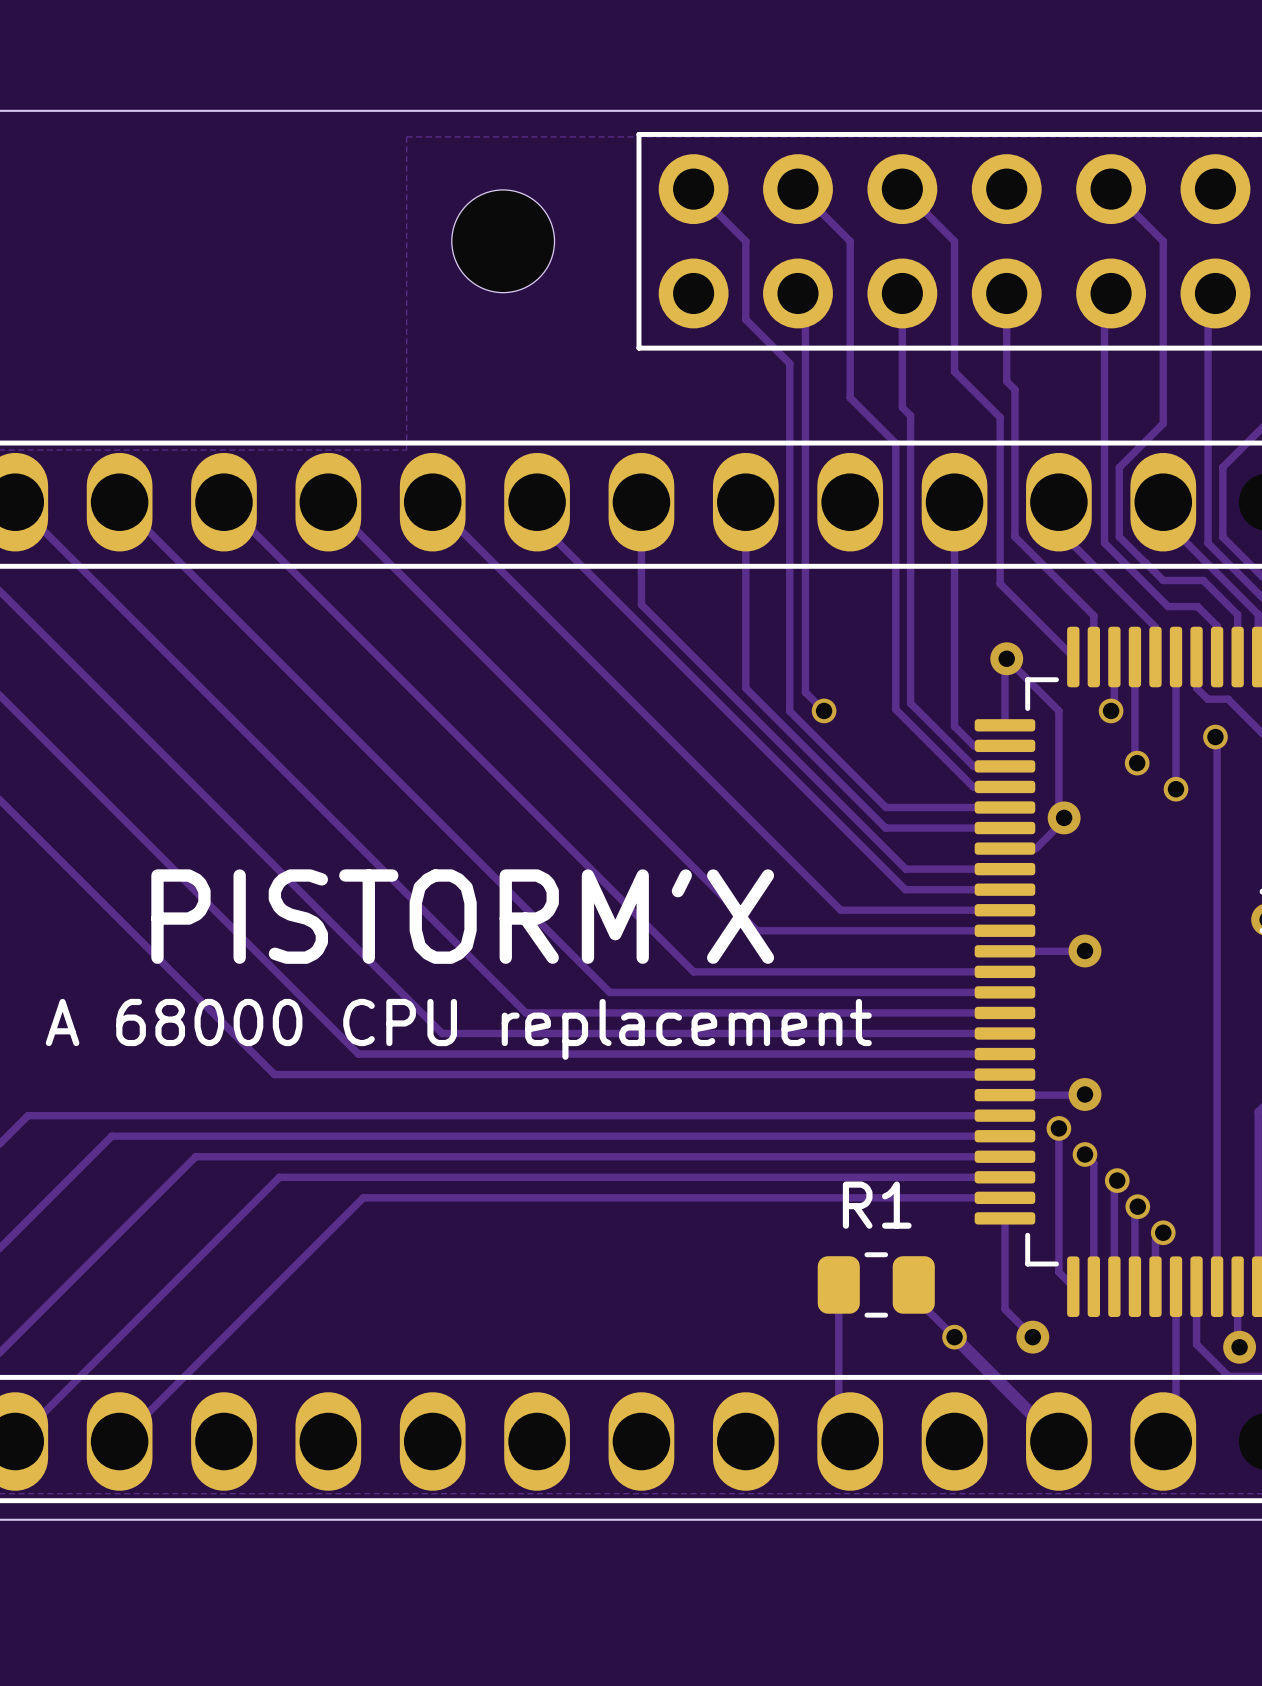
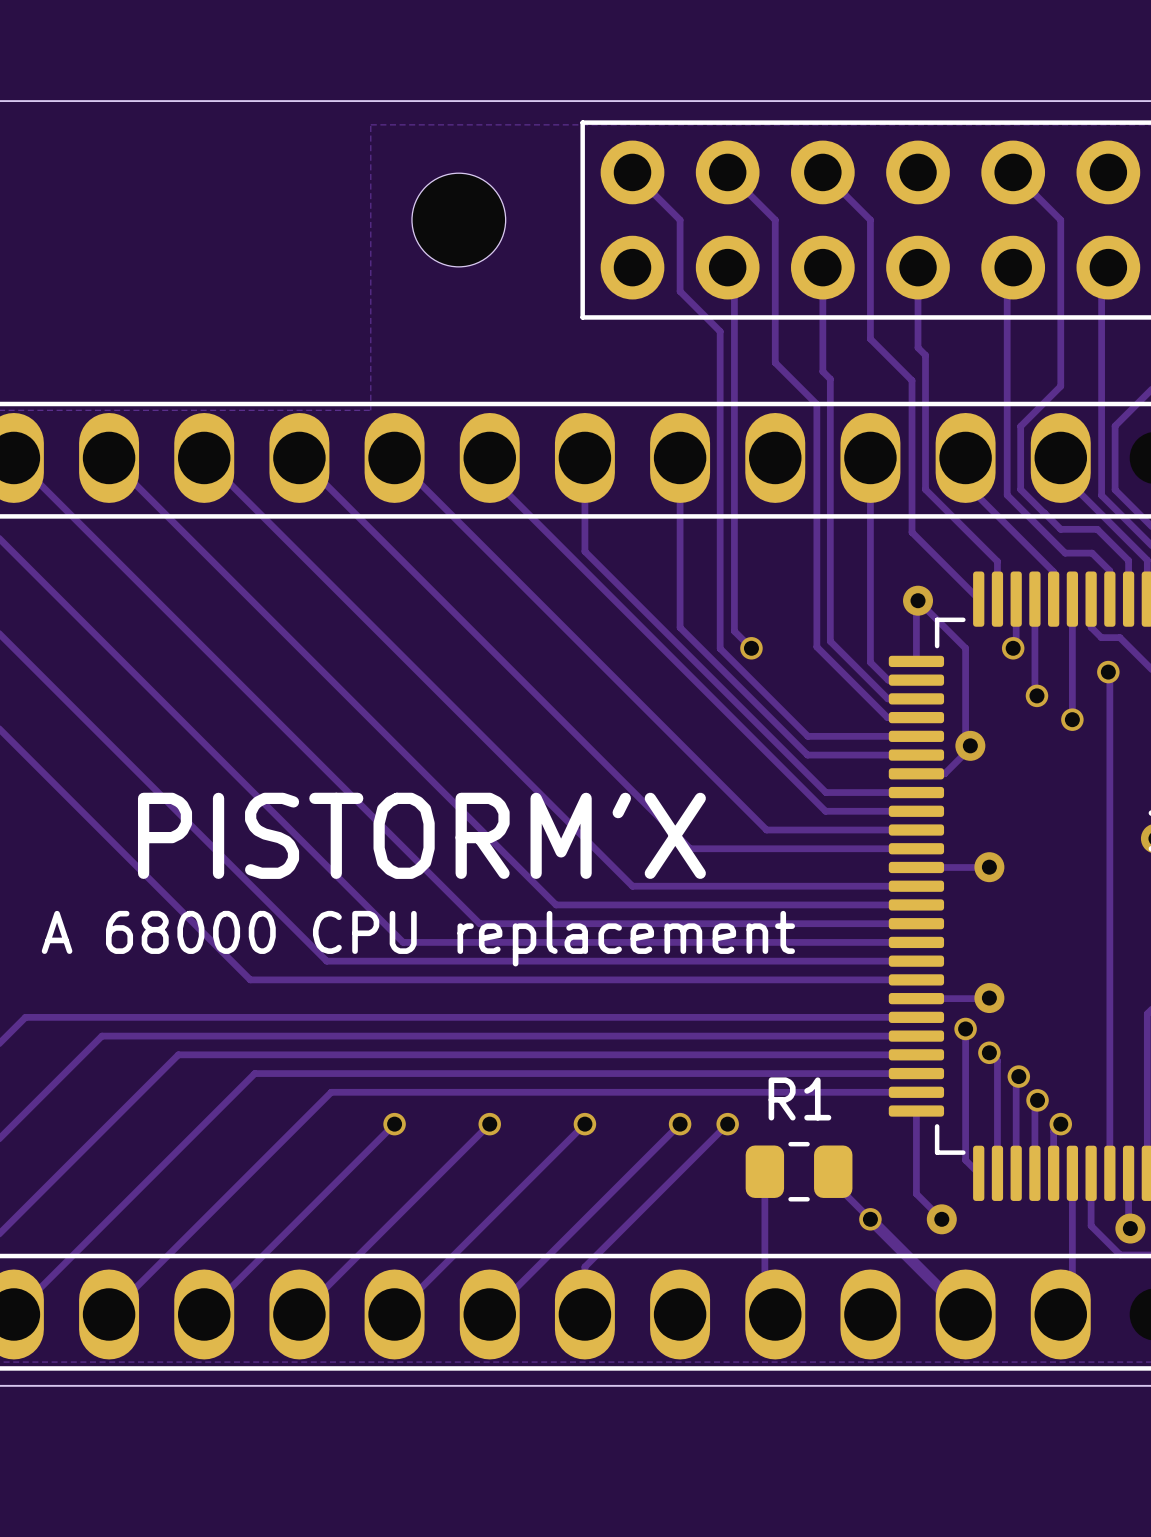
track: none -> (394, 1124) (204, 1314)
via: none -> (394, 1124)
track: none -> (489, 1124) (299, 1314)
via: none -> (489, 1124)
track: none -> (584, 1124) (394, 1314)
via: none -> (584, 1124)
track: none -> (680, 1124) (489, 1314)
via: none -> (680, 1124)
track: none -> (727, 1124) (584, 1266) (584, 1314)
via: none -> (727, 1124)

